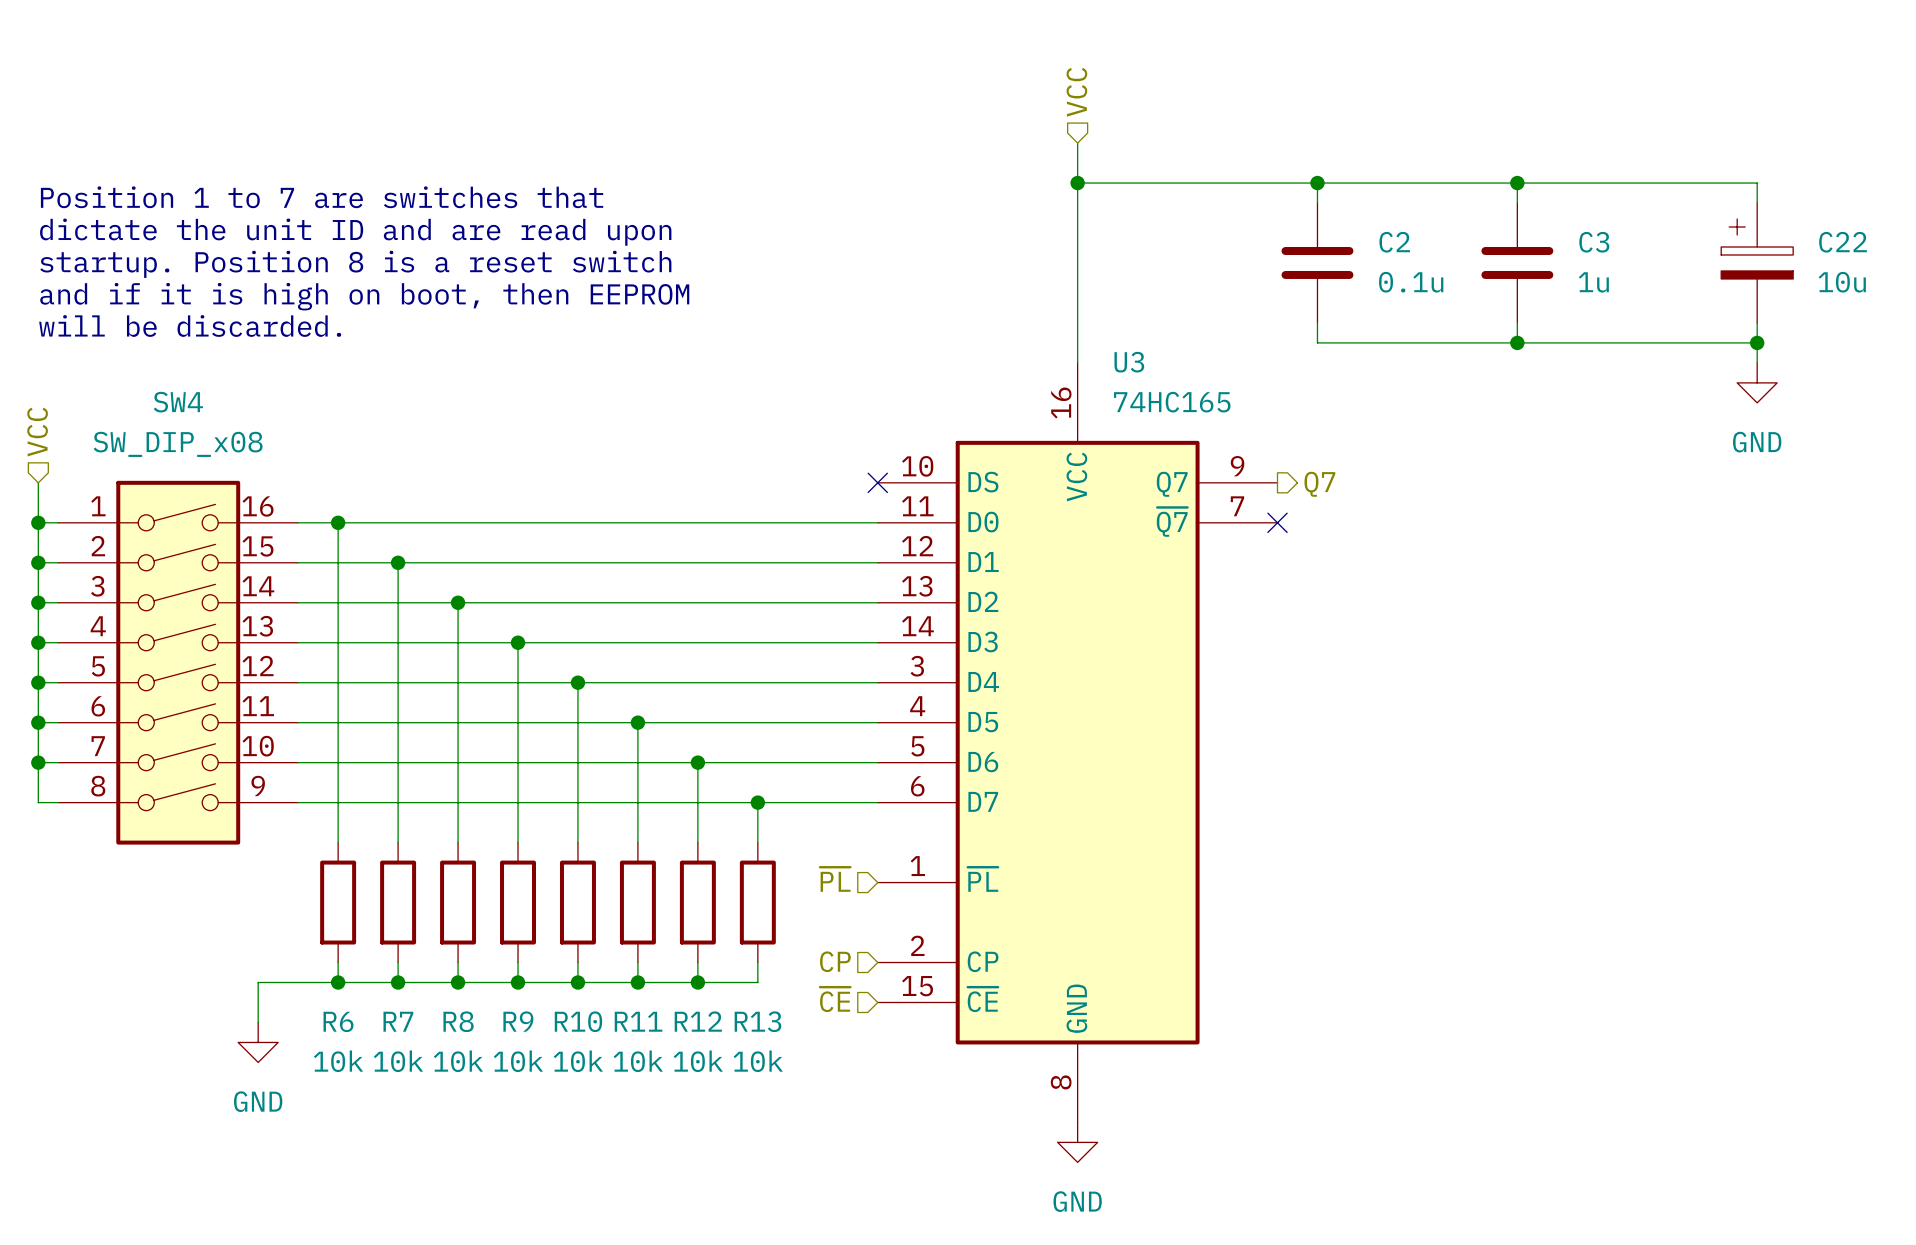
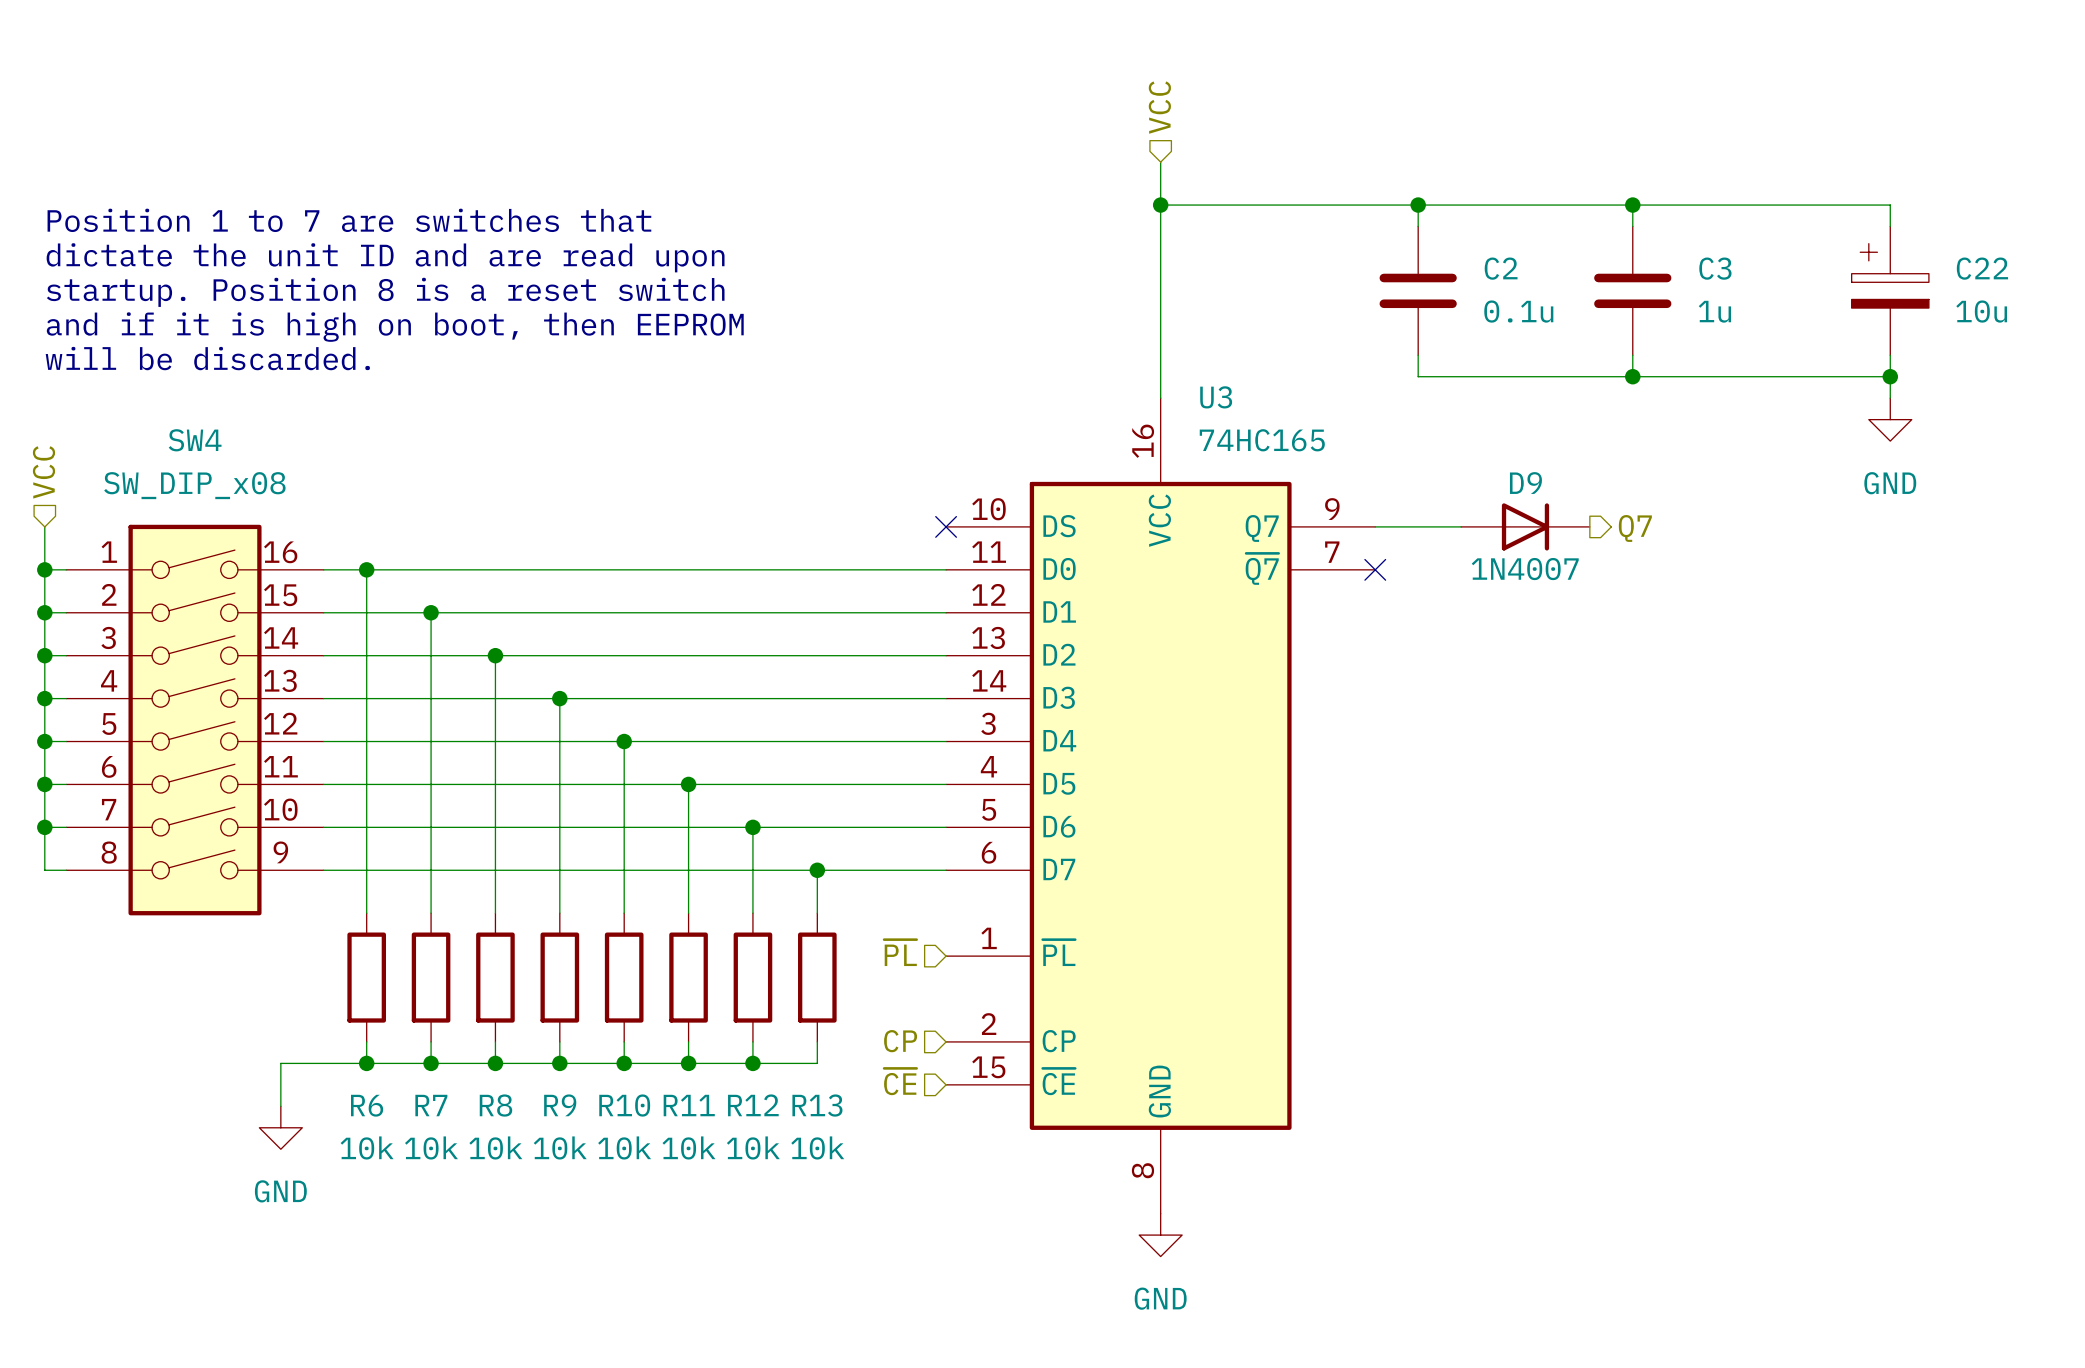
wire: none -> (1375, 526) (1461, 526)
D9: none -> 1N4007 (1525, 526)
hierarchical label position: Q7 (1319, 484) -> Q7 (1635, 528)

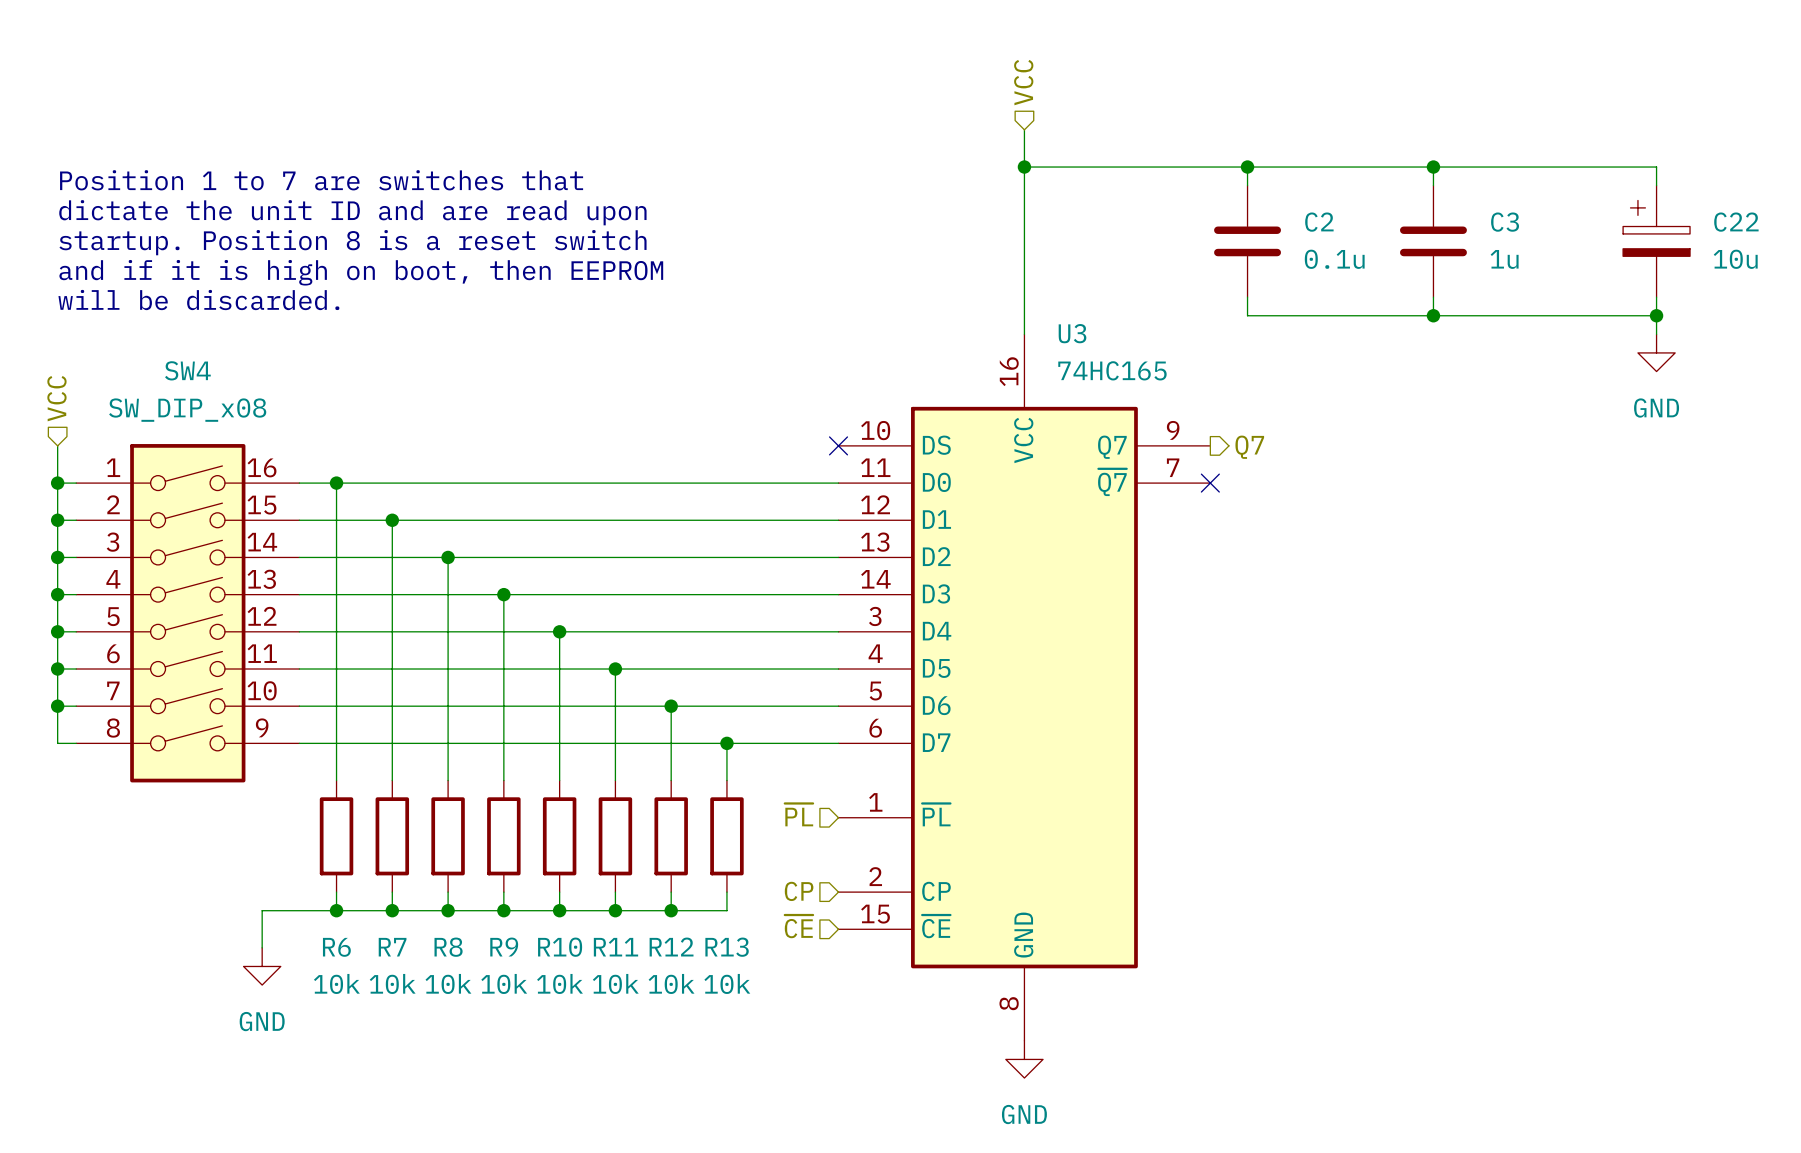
wire: (1375, 526) (1461, 526) -> none
D9: 1N4007 (1525, 526) -> none
hierarchical label position: Q7 (1635, 528) -> Q7 (1249, 447)

